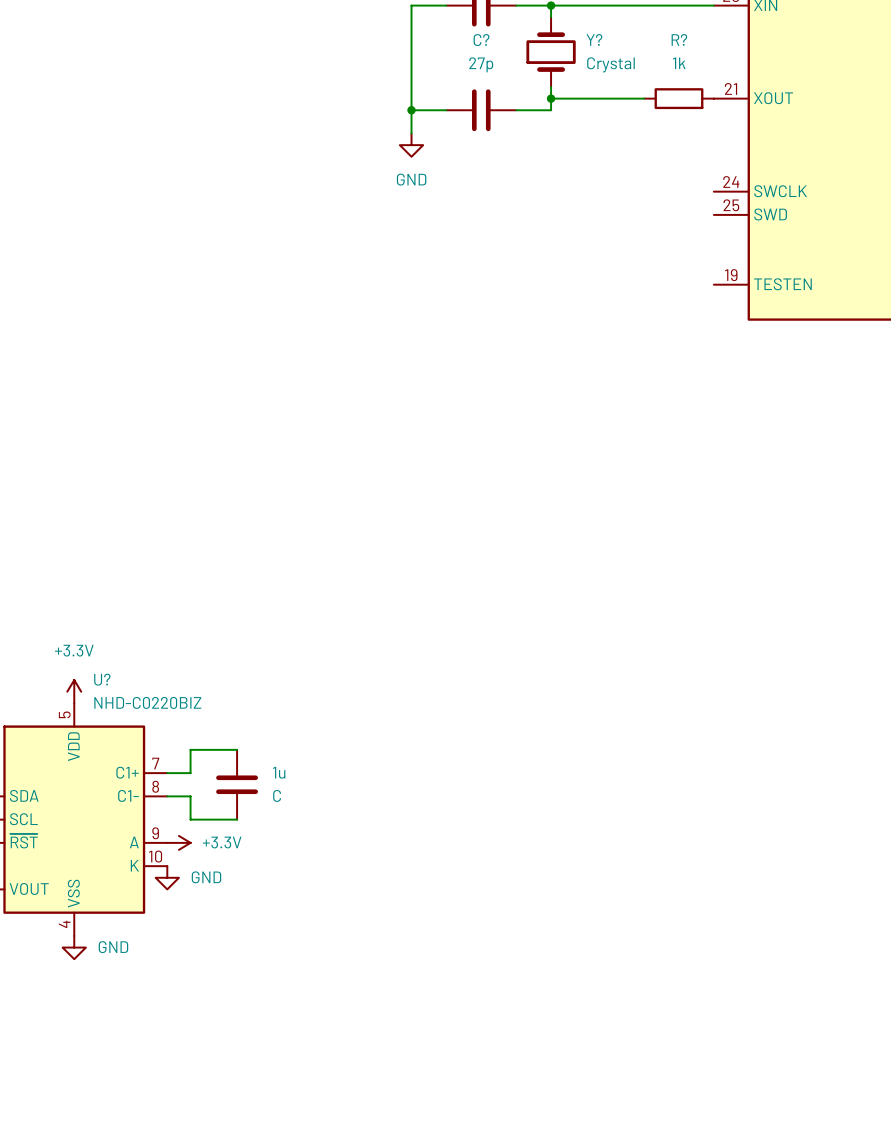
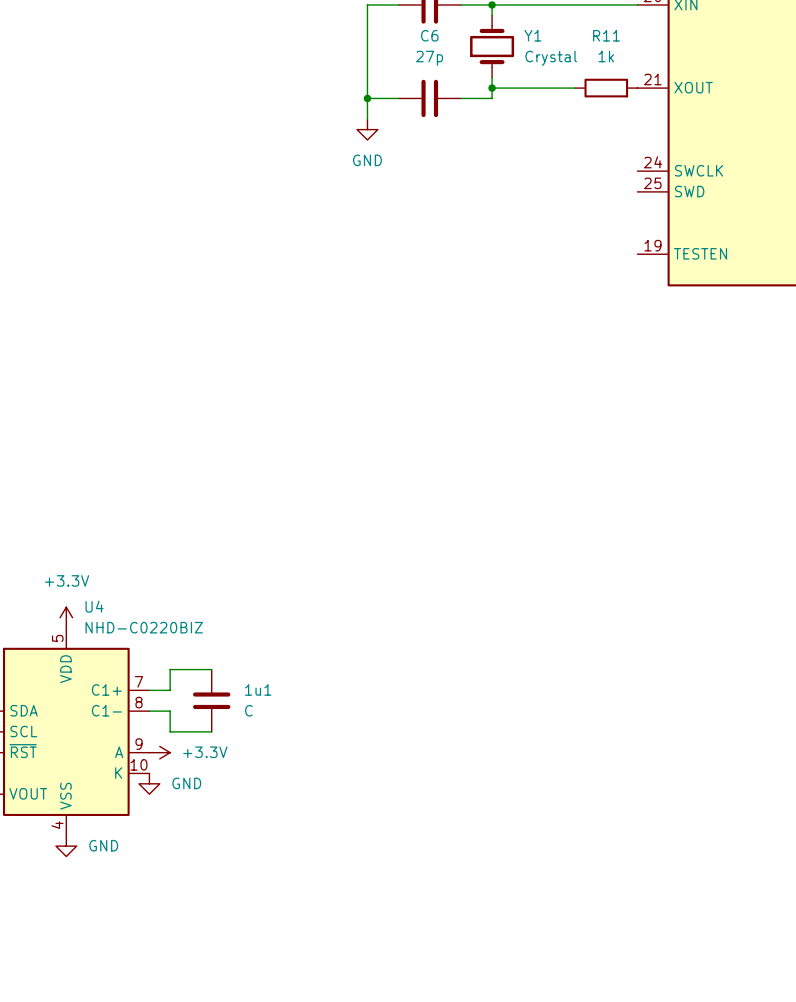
Y? name: Y? (594, 39) -> Y1 (532, 35)
R? name: R? (679, 39) -> R11 (606, 35)
C? name: C? (481, 40) -> C6 (429, 35)
U? name: U? (102, 679) -> U4 (94, 606)
1u name: 1u (279, 772) -> 1u1 (258, 689)

